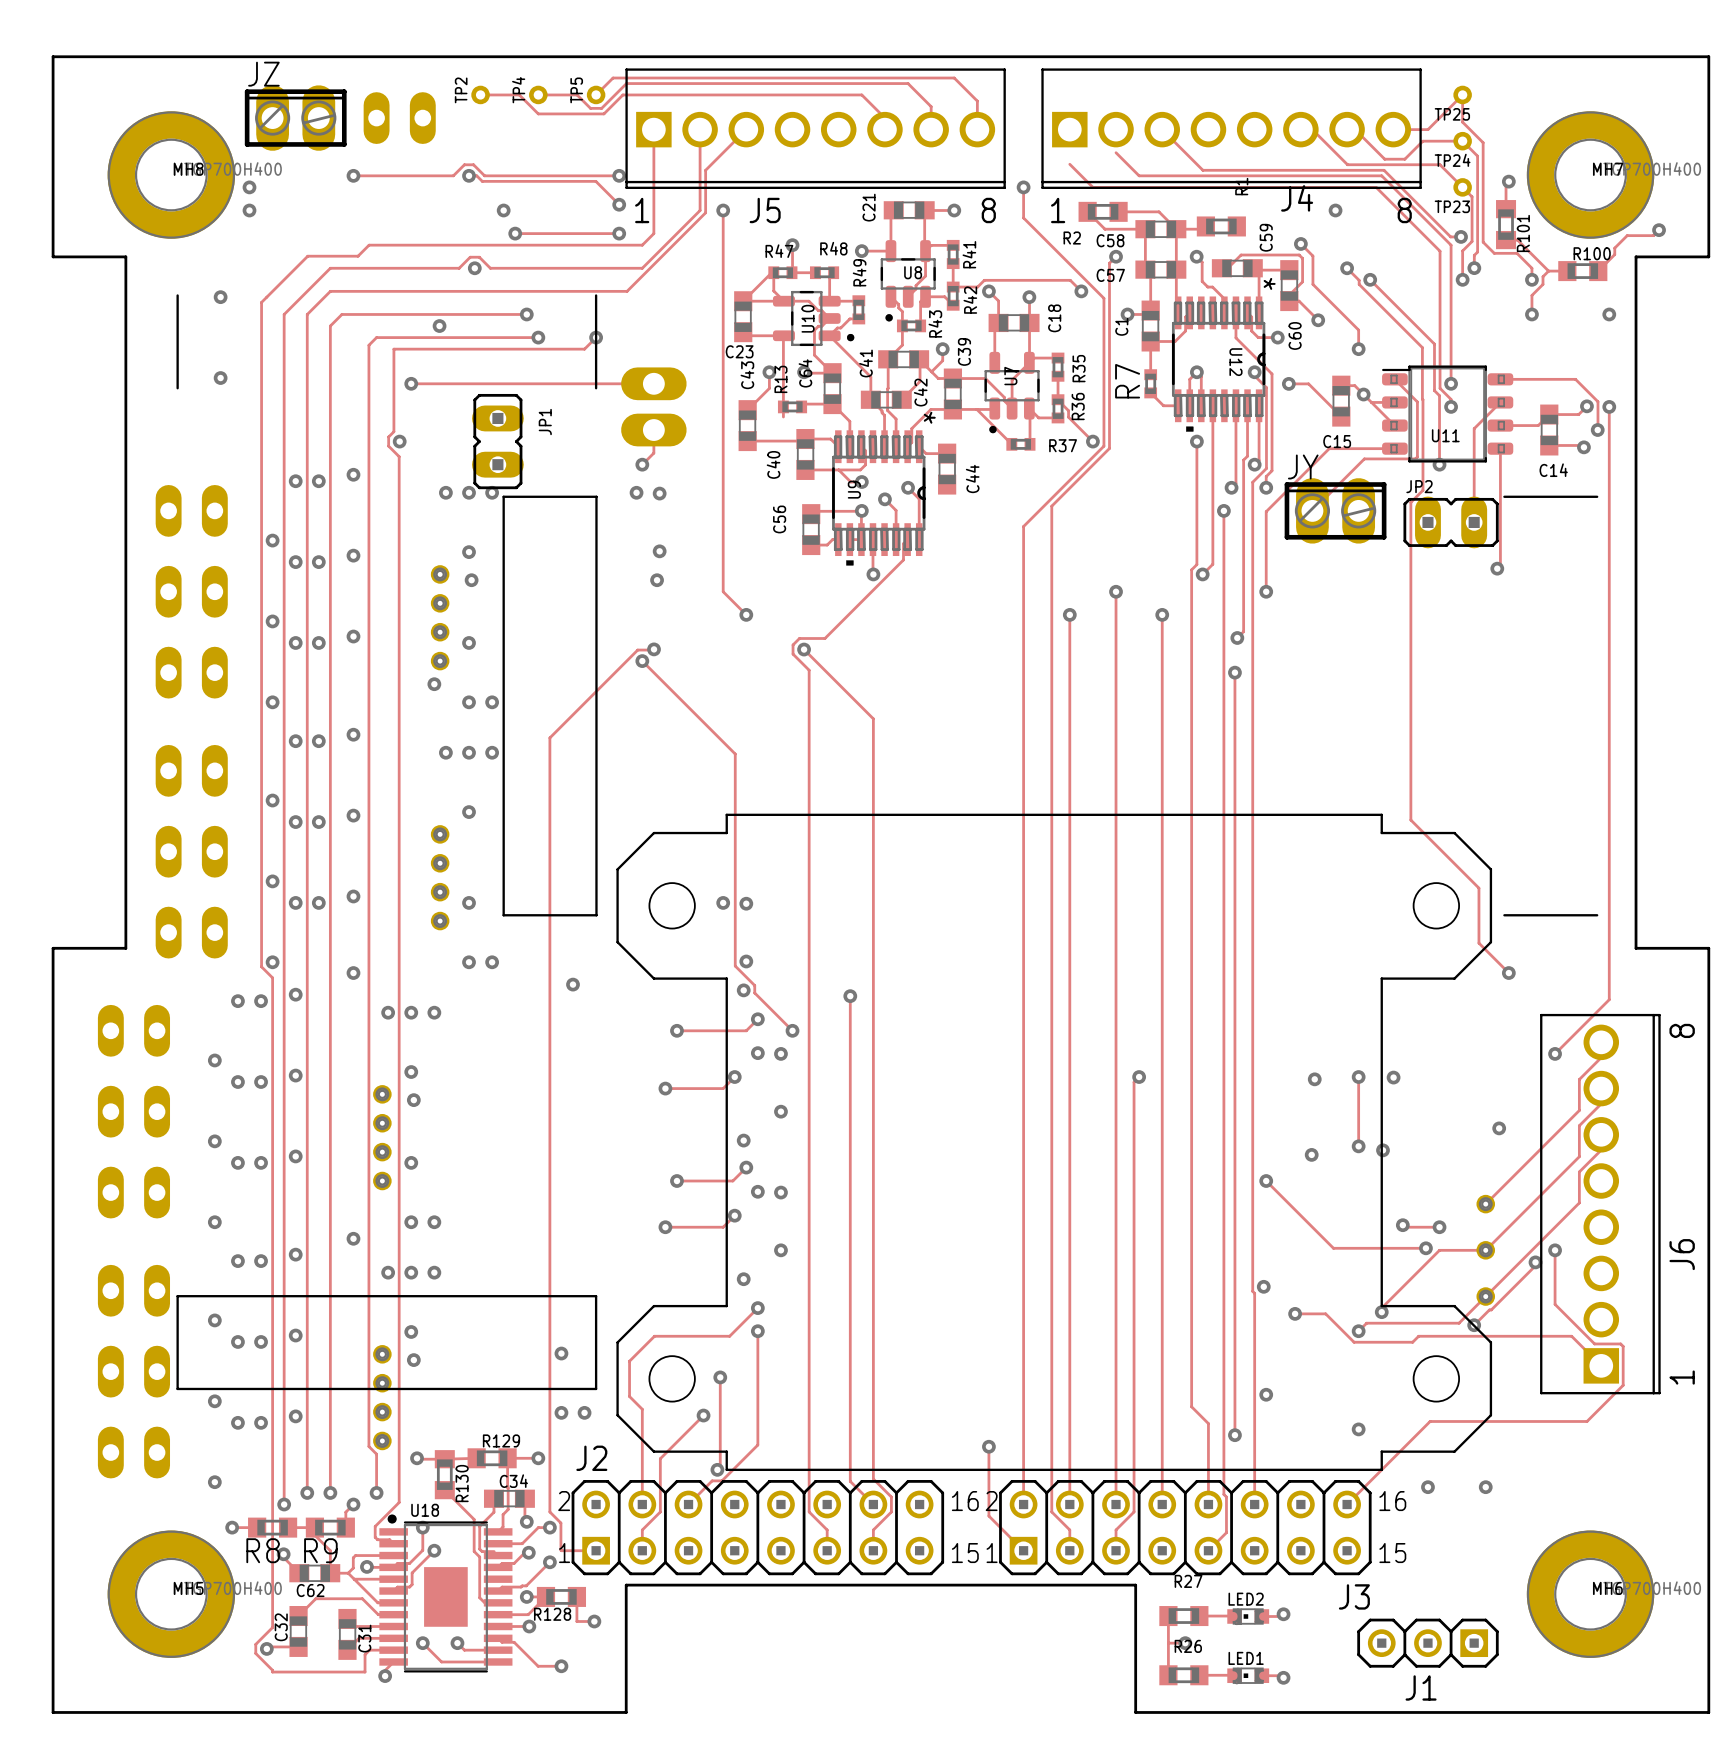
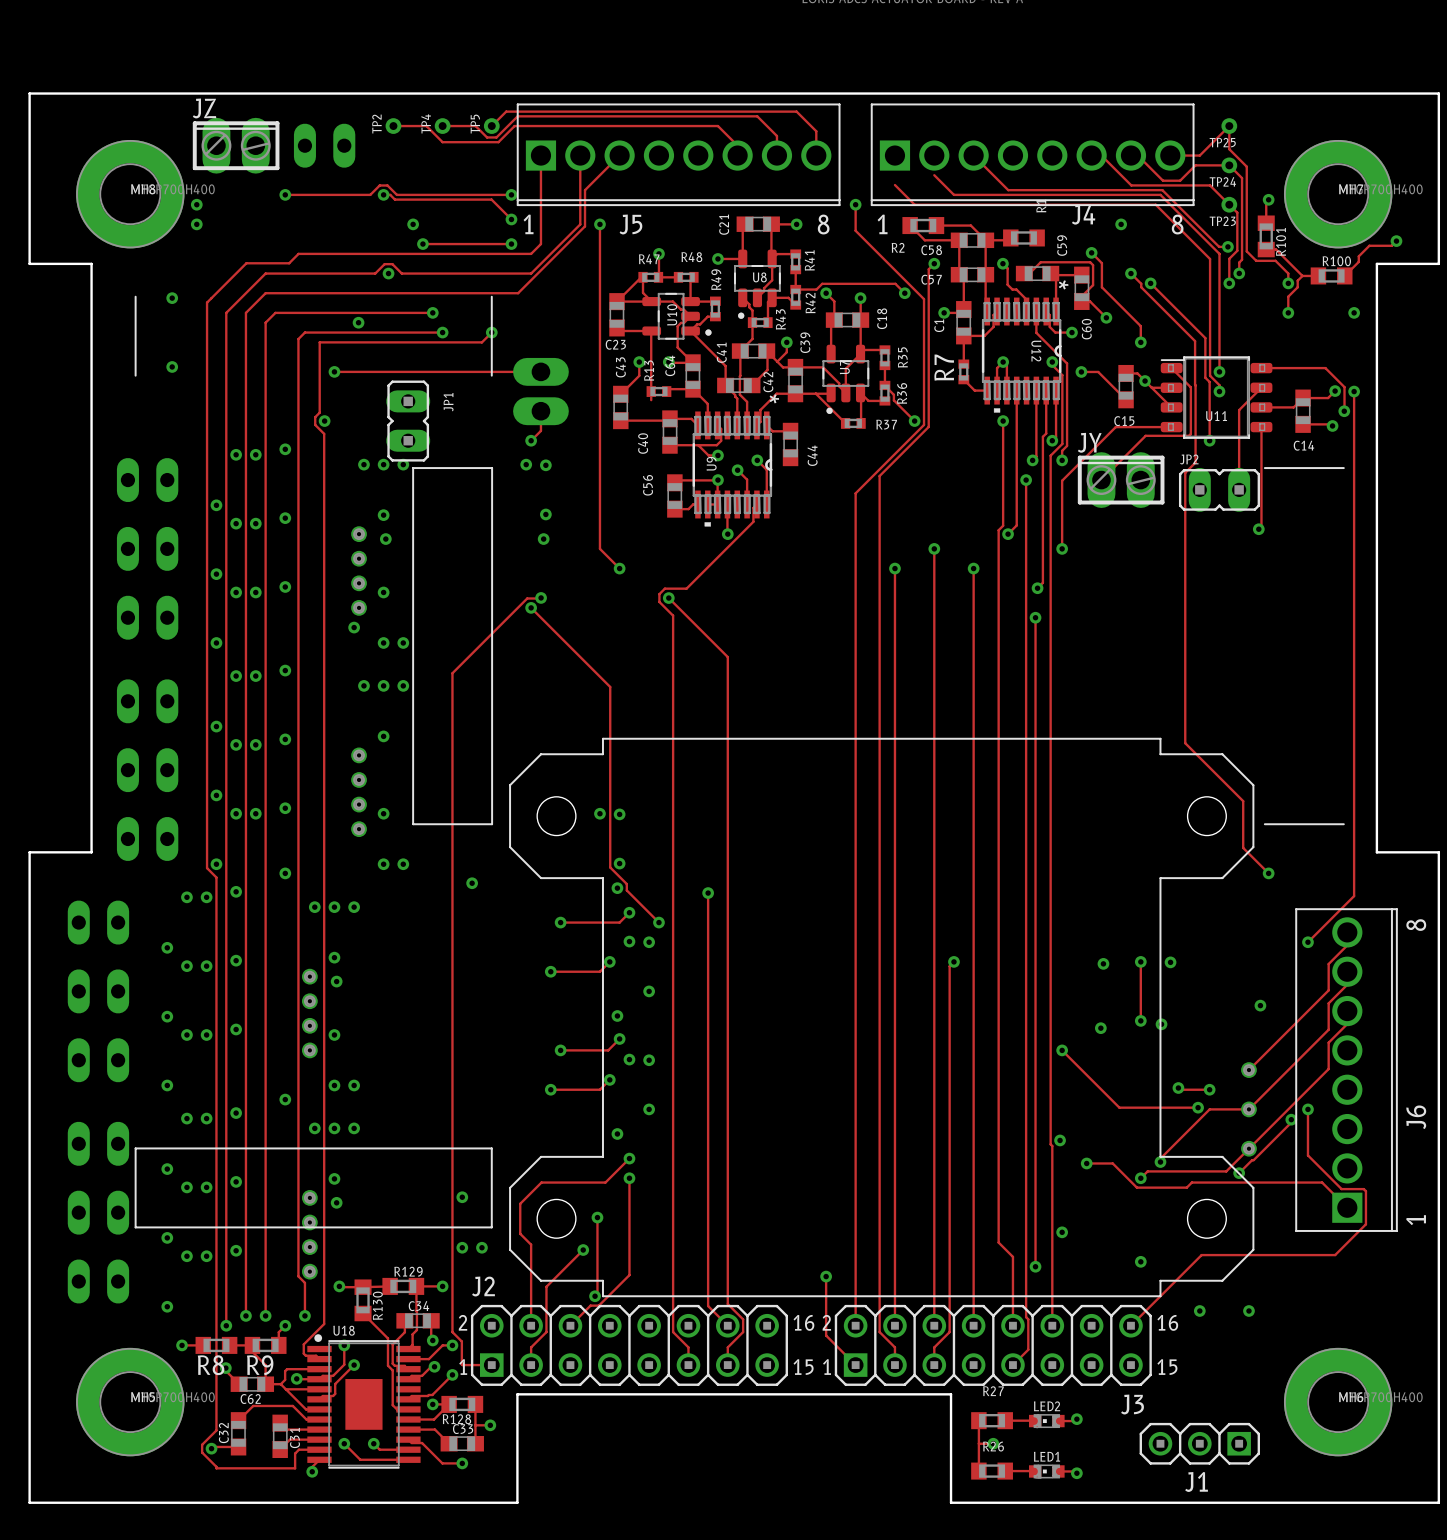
track: none -> (475, 1425) (475, 1443)
track: none -> (434, 1429) (449, 1443)
via: (529, 1626) -> none
C33: none -> (462, 1443)

